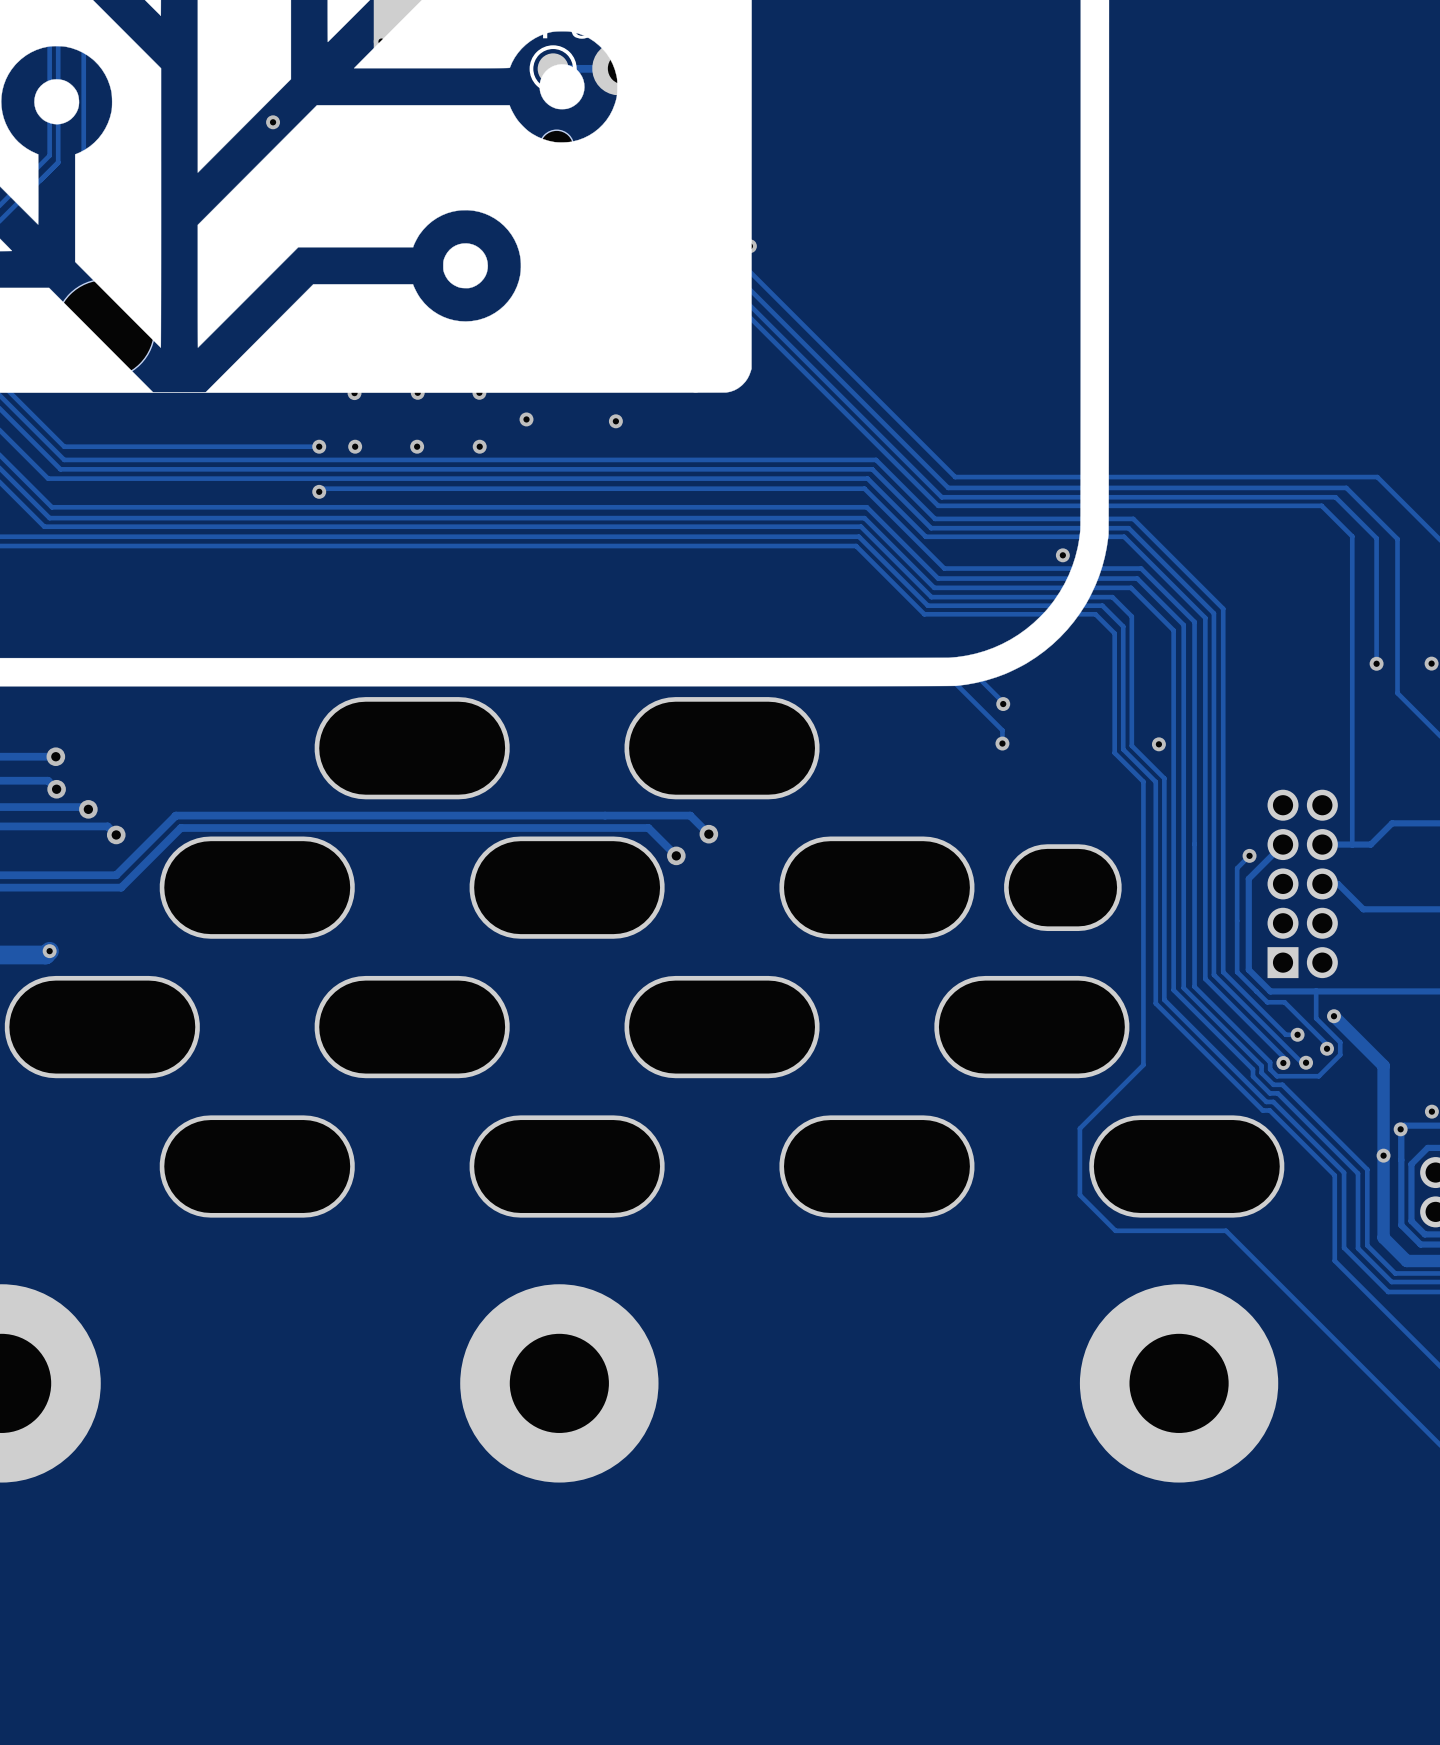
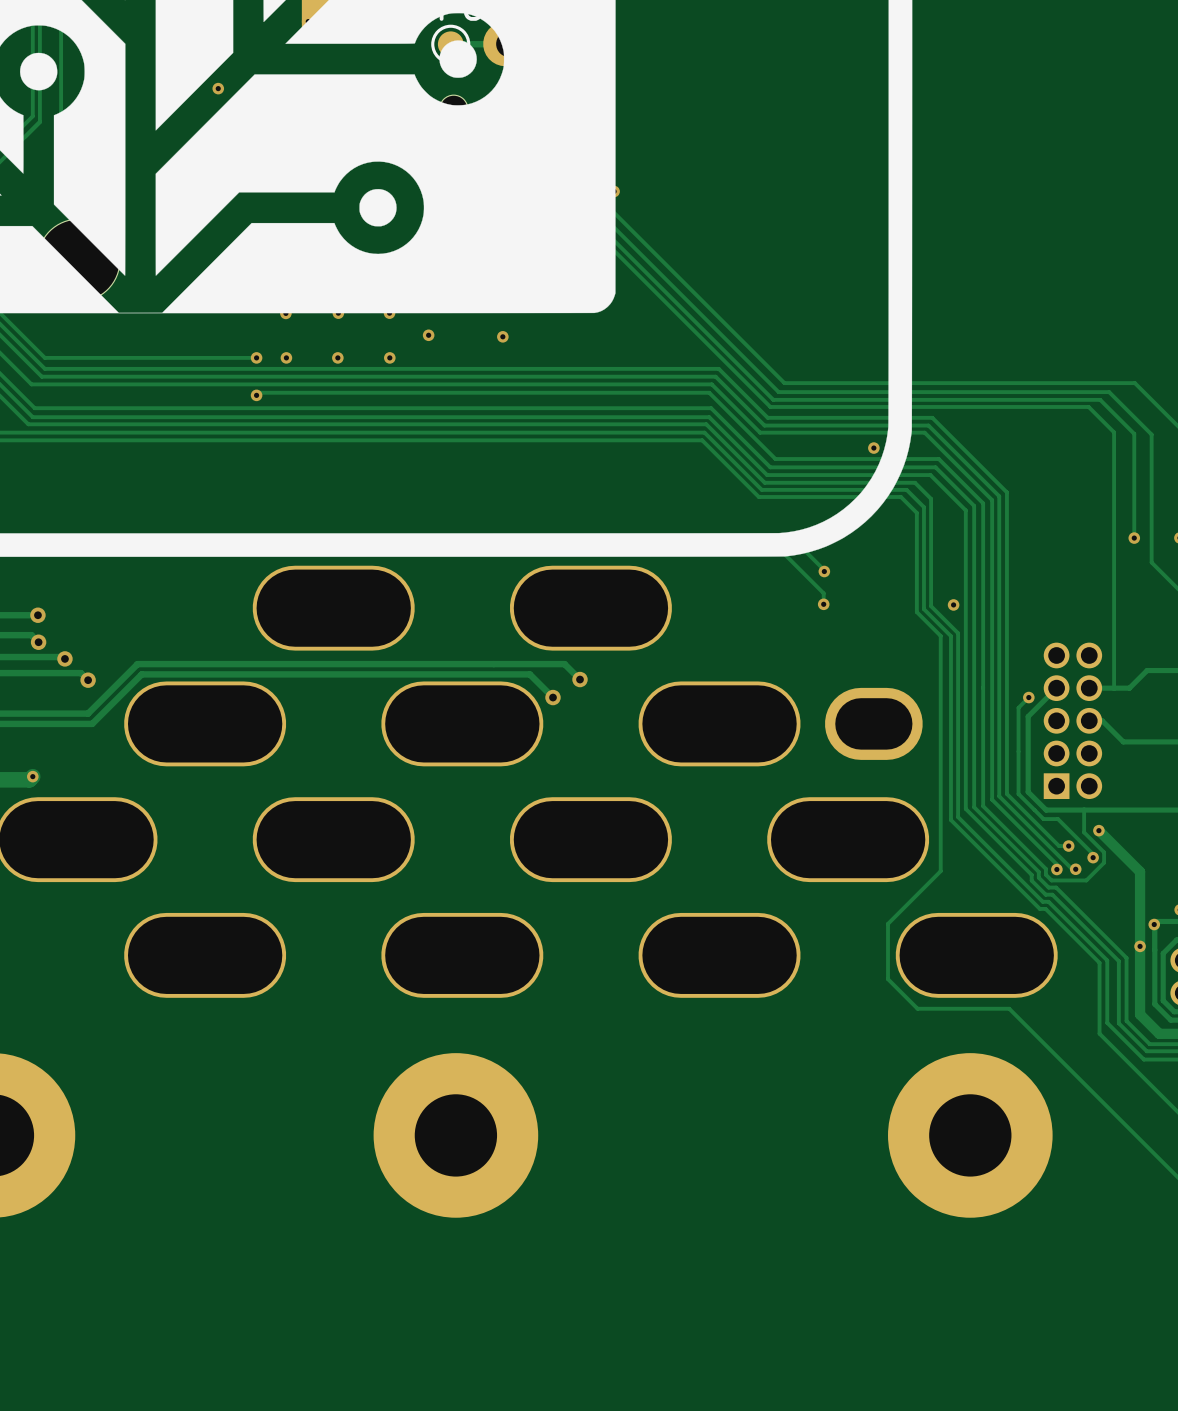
part footprint: [1003, 844, 1122, 932] -> [824, 687, 923, 760]

